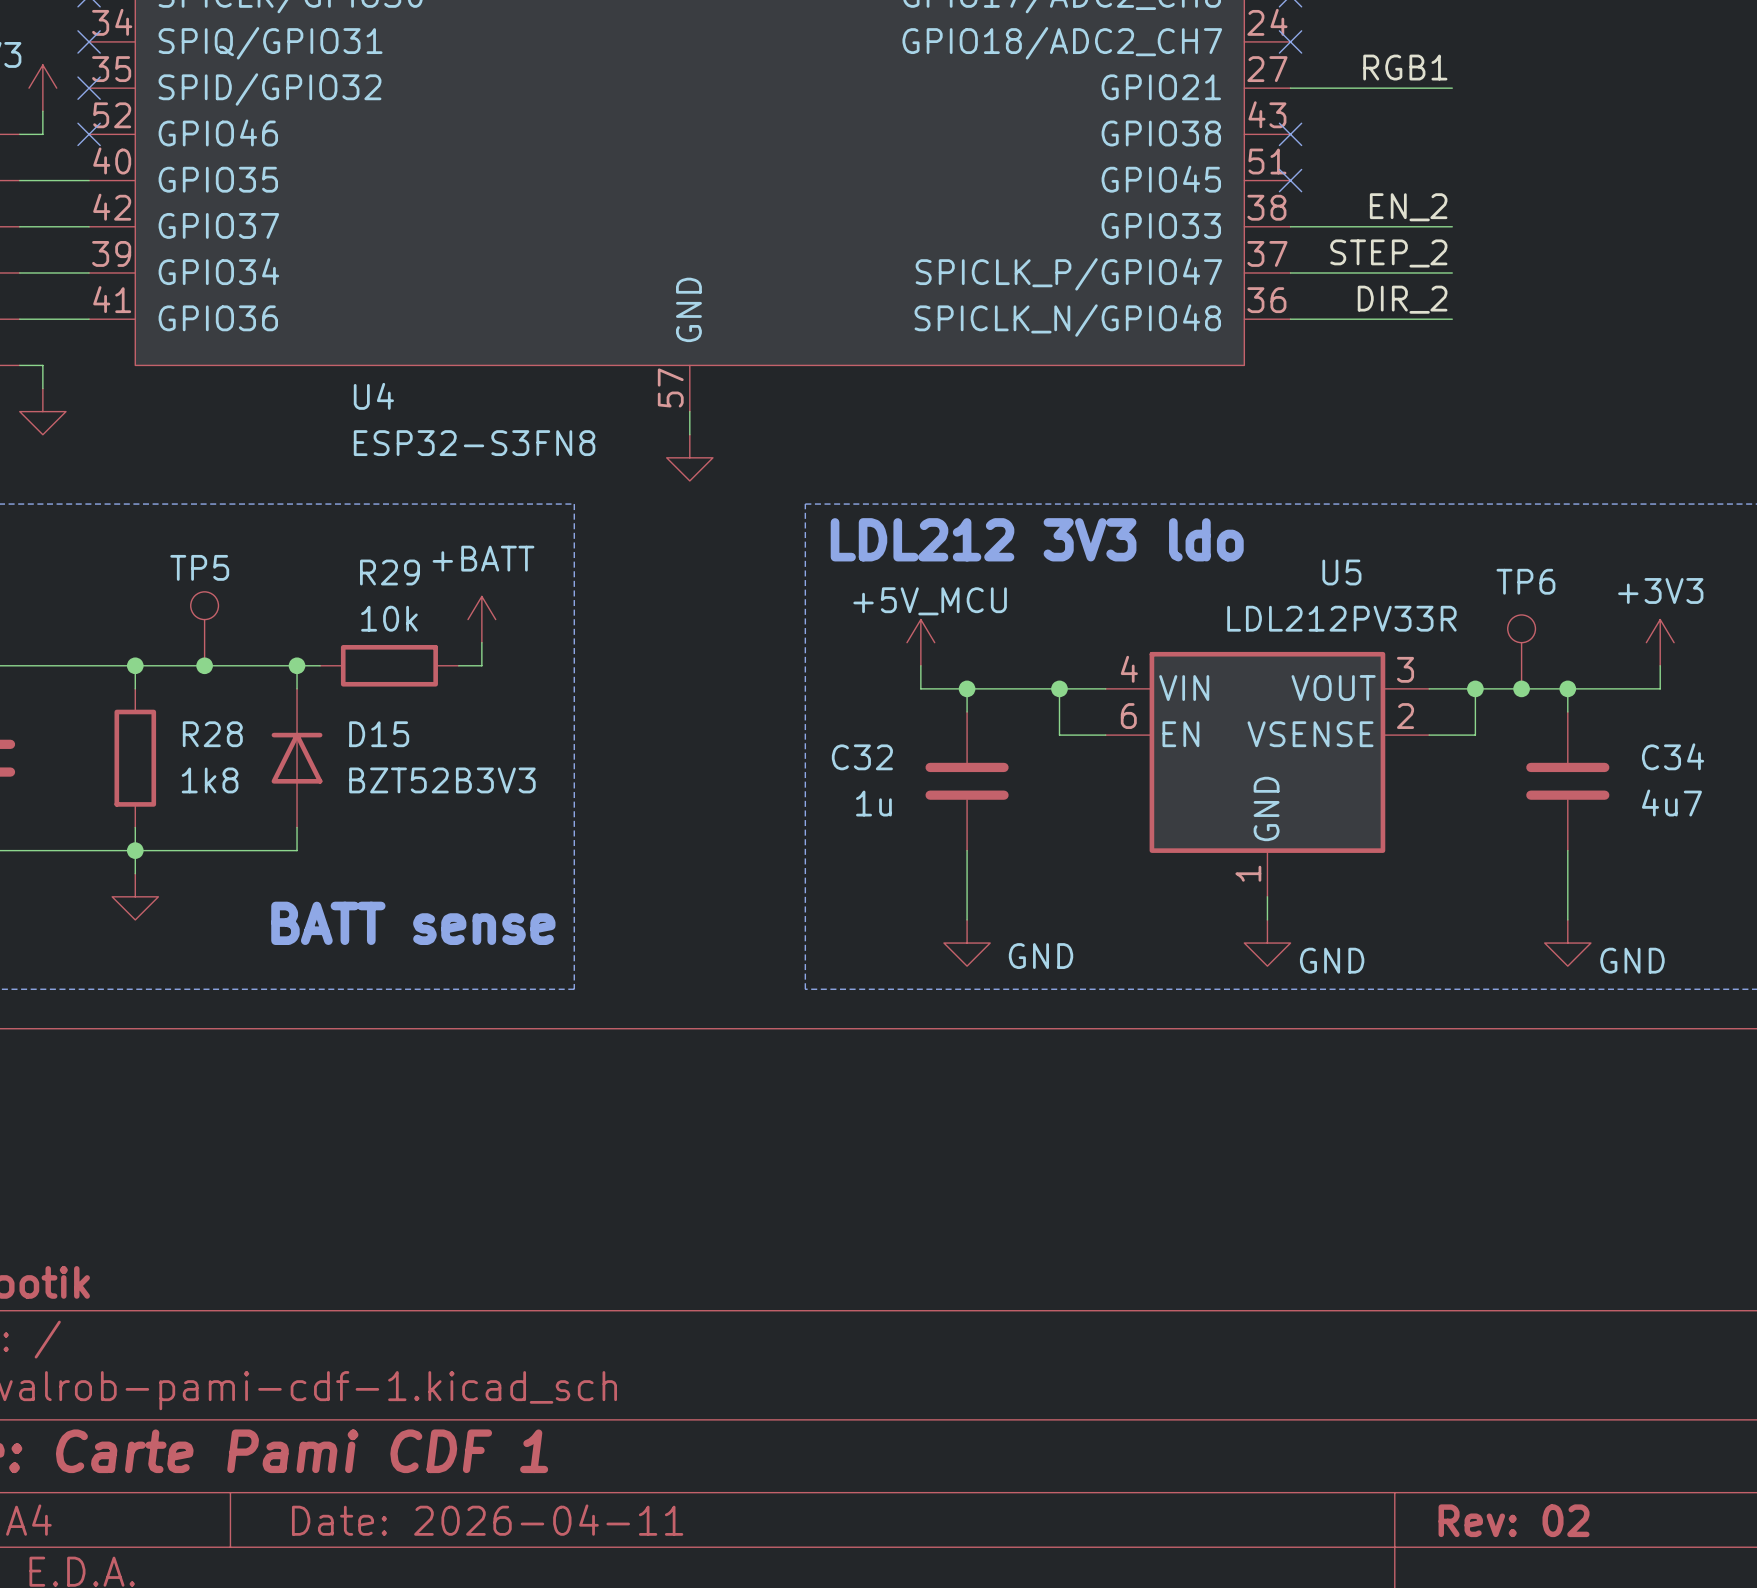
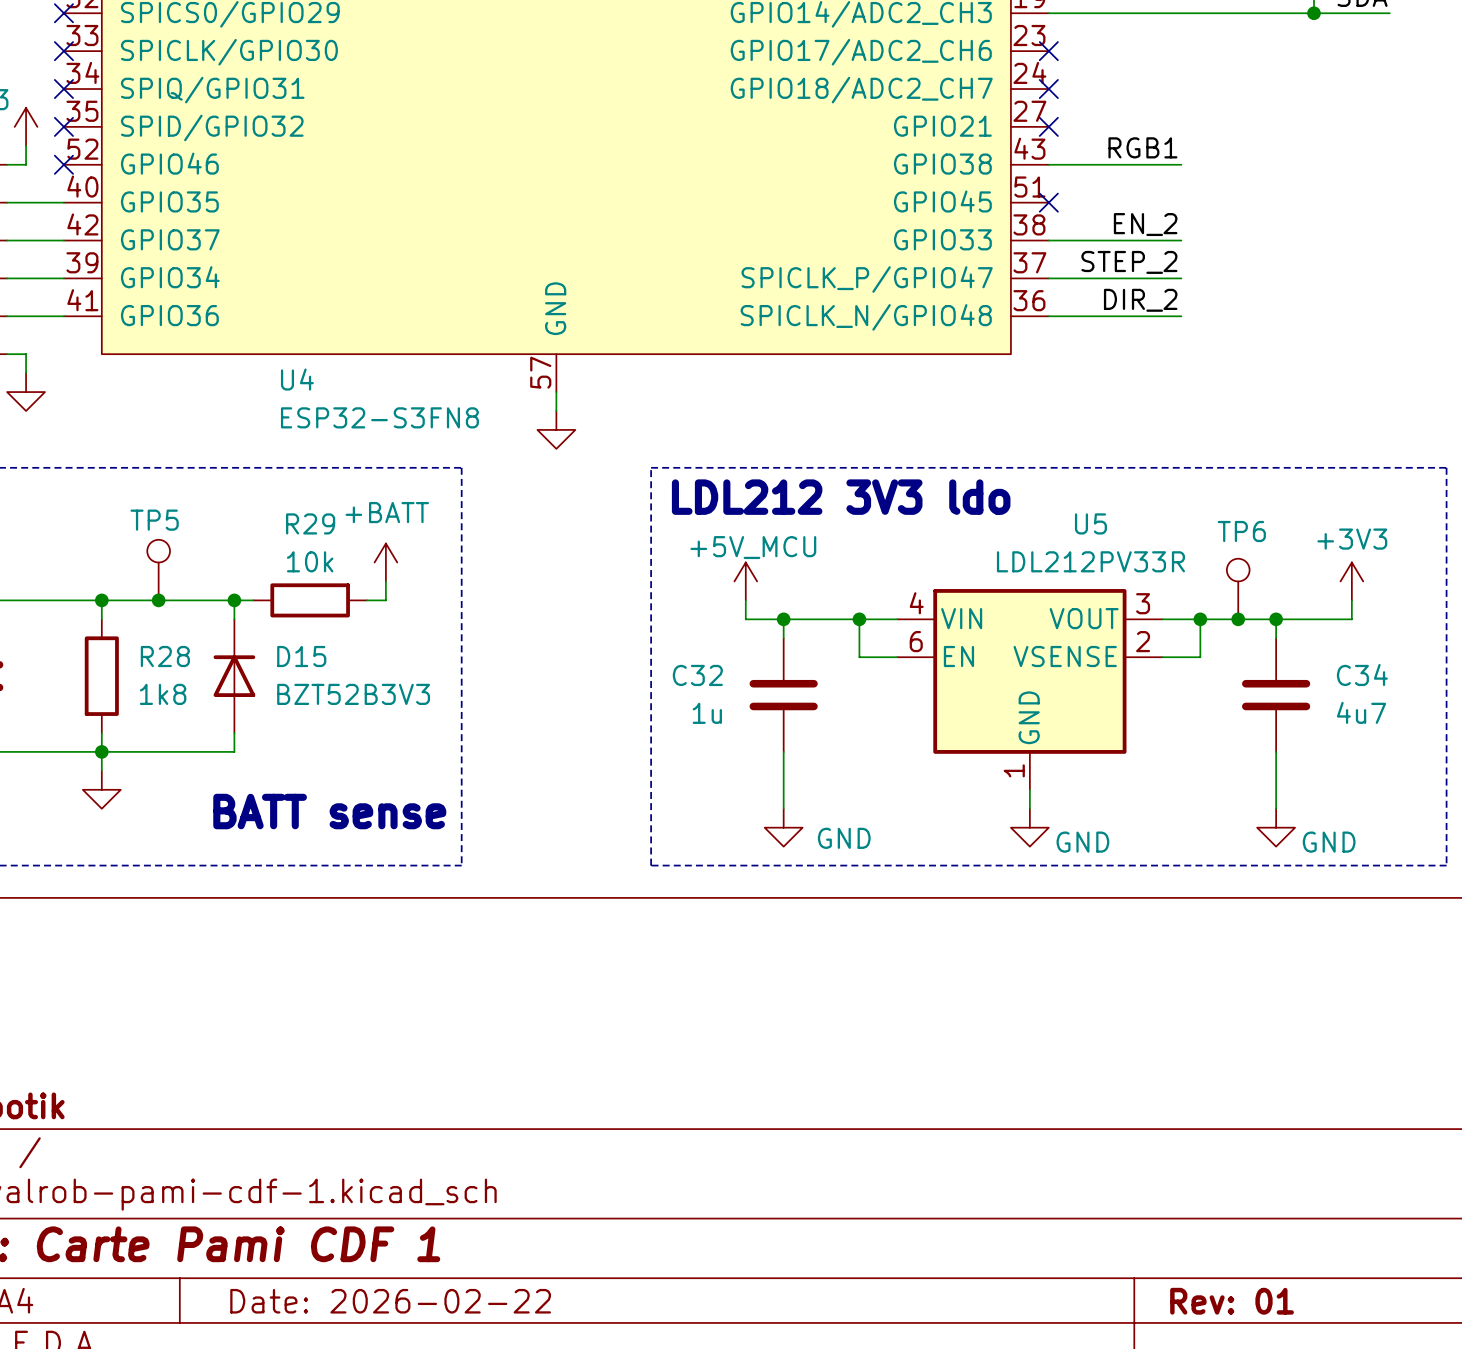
label position: RGB1 (1405, 67) -> RGB1 (1142, 147)
wire: (1290, 88) (1452, 88) -> (1048, 164) (1181, 164)
no-connect mark position: (1290, 134) -> (1048, 126)
title block: Date: 2026-04-11 (487, 1520) -> Date: 2026-02-22 (390, 1301)
title block: Rev: 02 (1514, 1520) -> Rev: 01 (1232, 1301)

